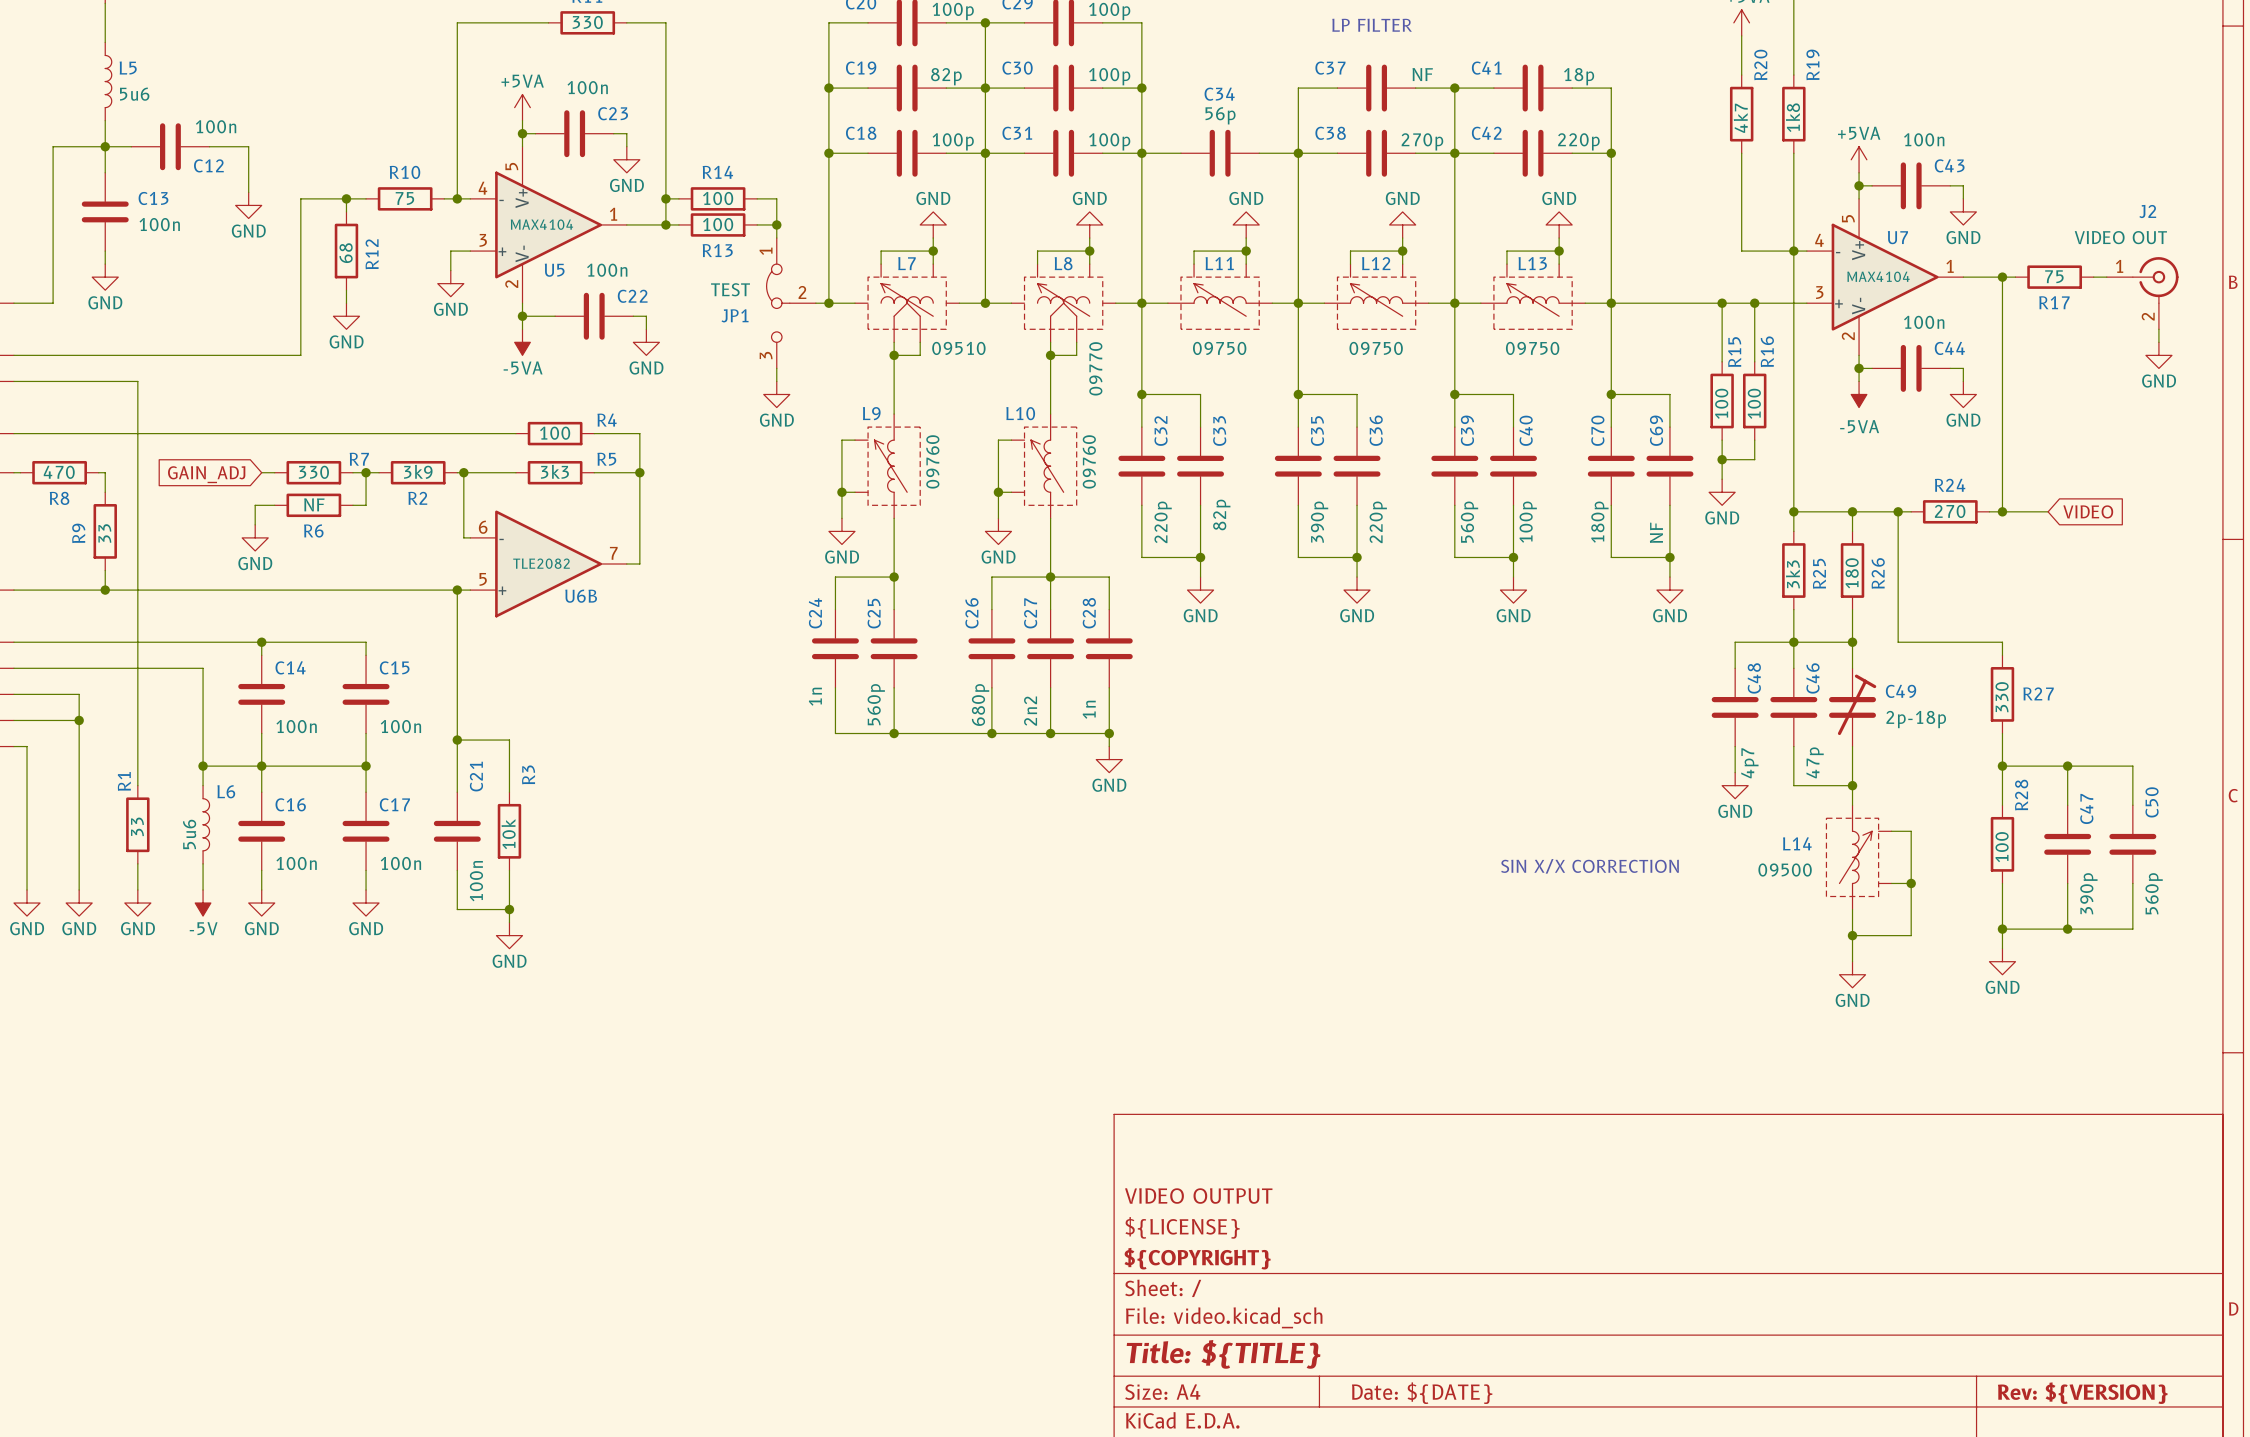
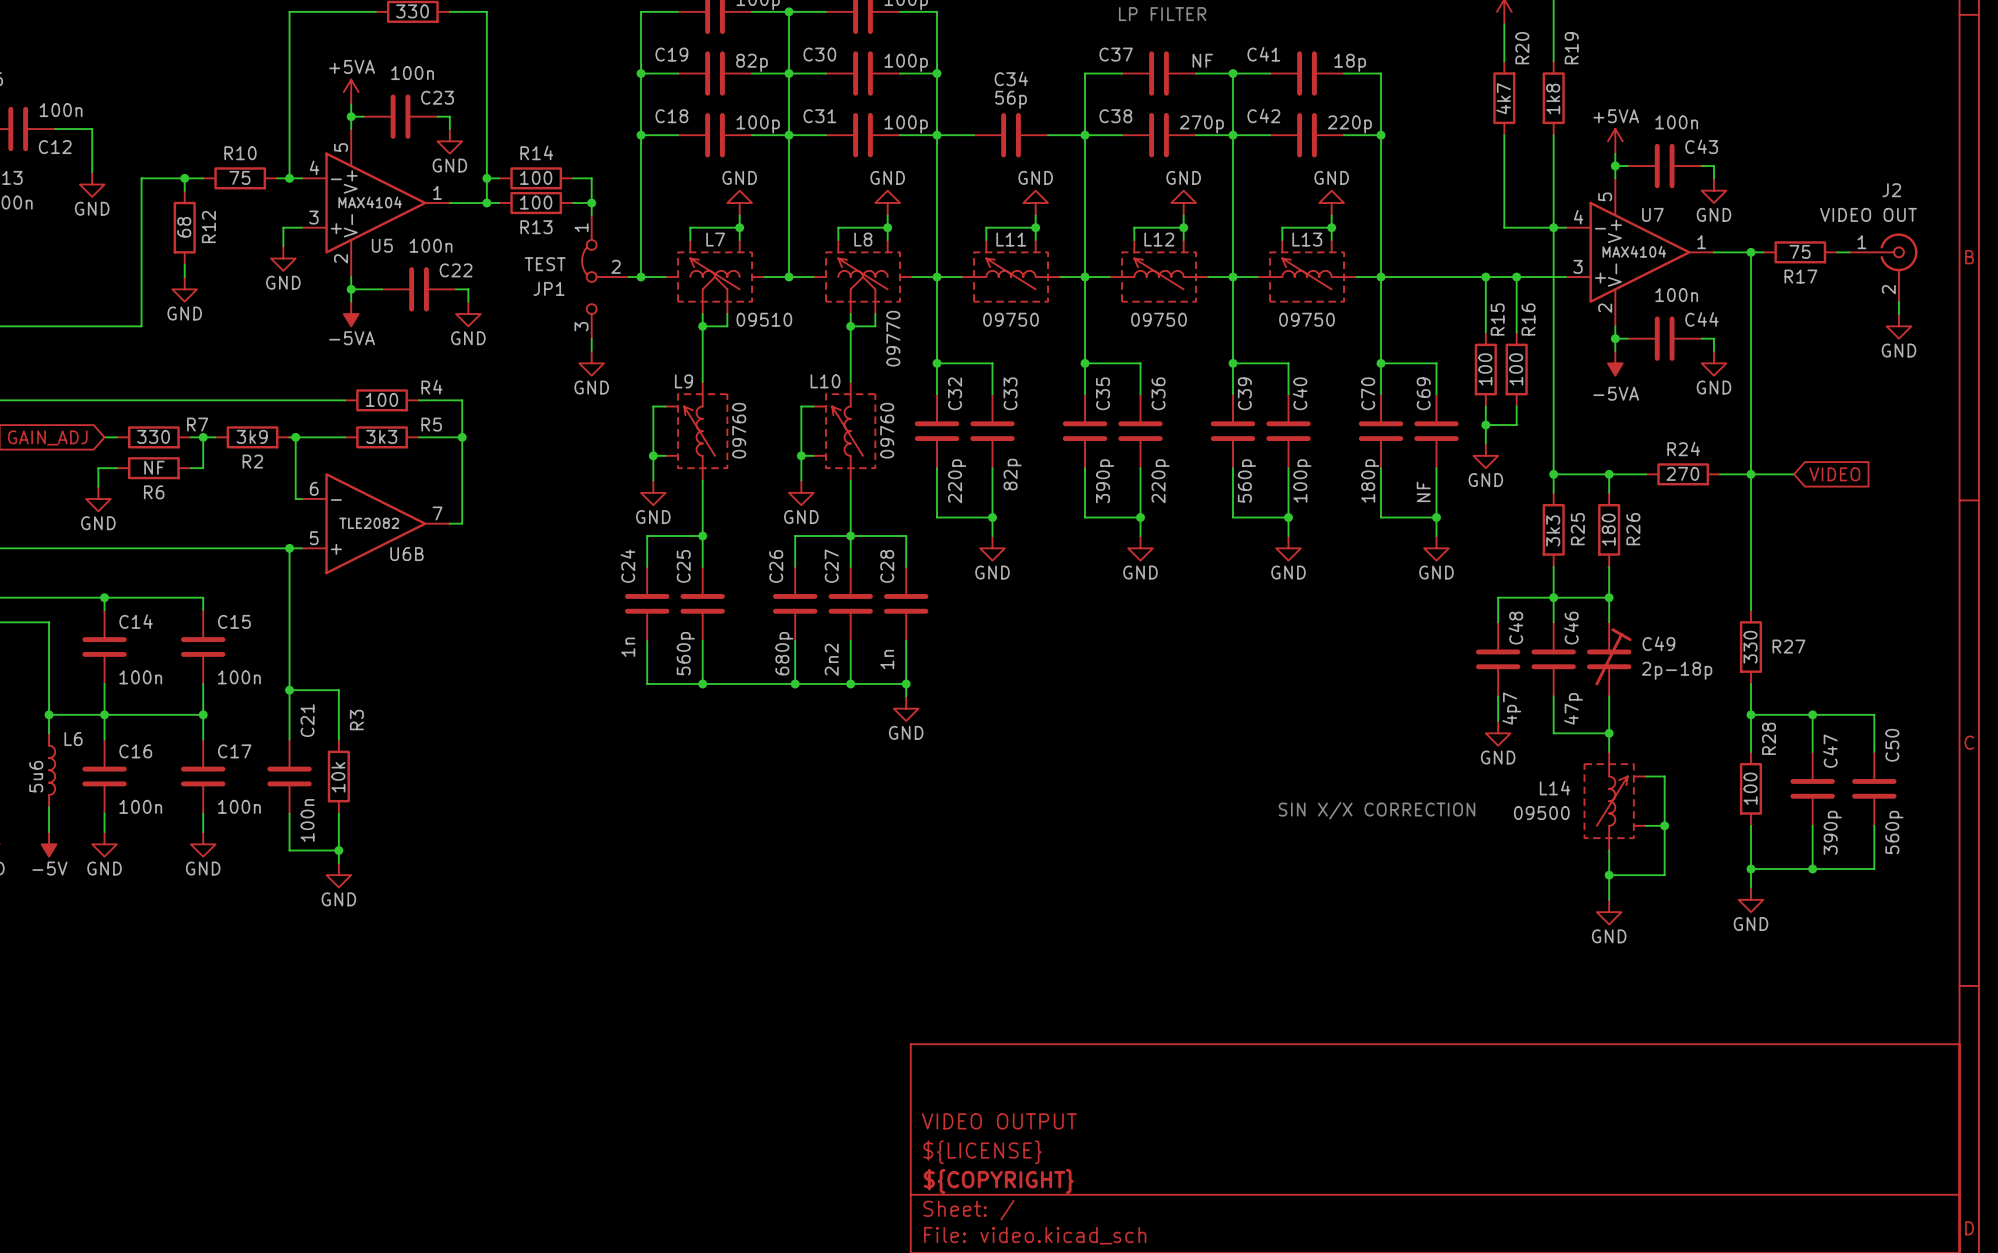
wire: (1898, 511) (1898, 642) (2002, 642) -> (1750, 474) (1750, 597)
junction: (1898, 511) -> none
R24 position: (1950, 511) -> (1683, 474)

